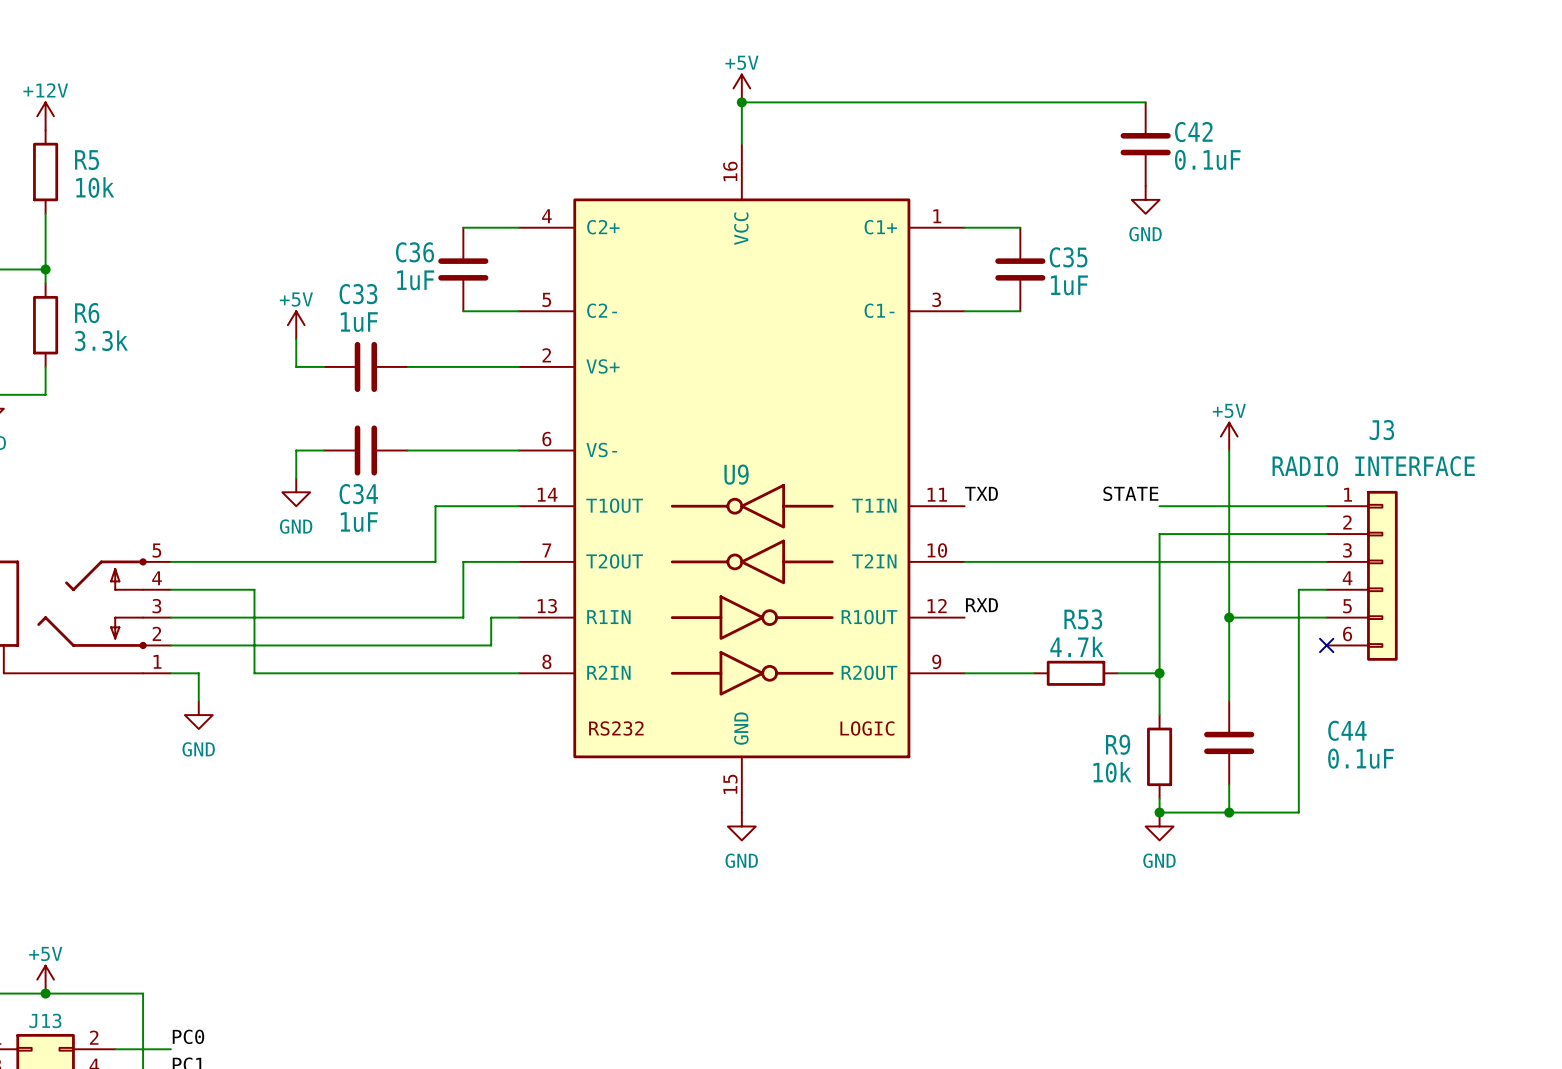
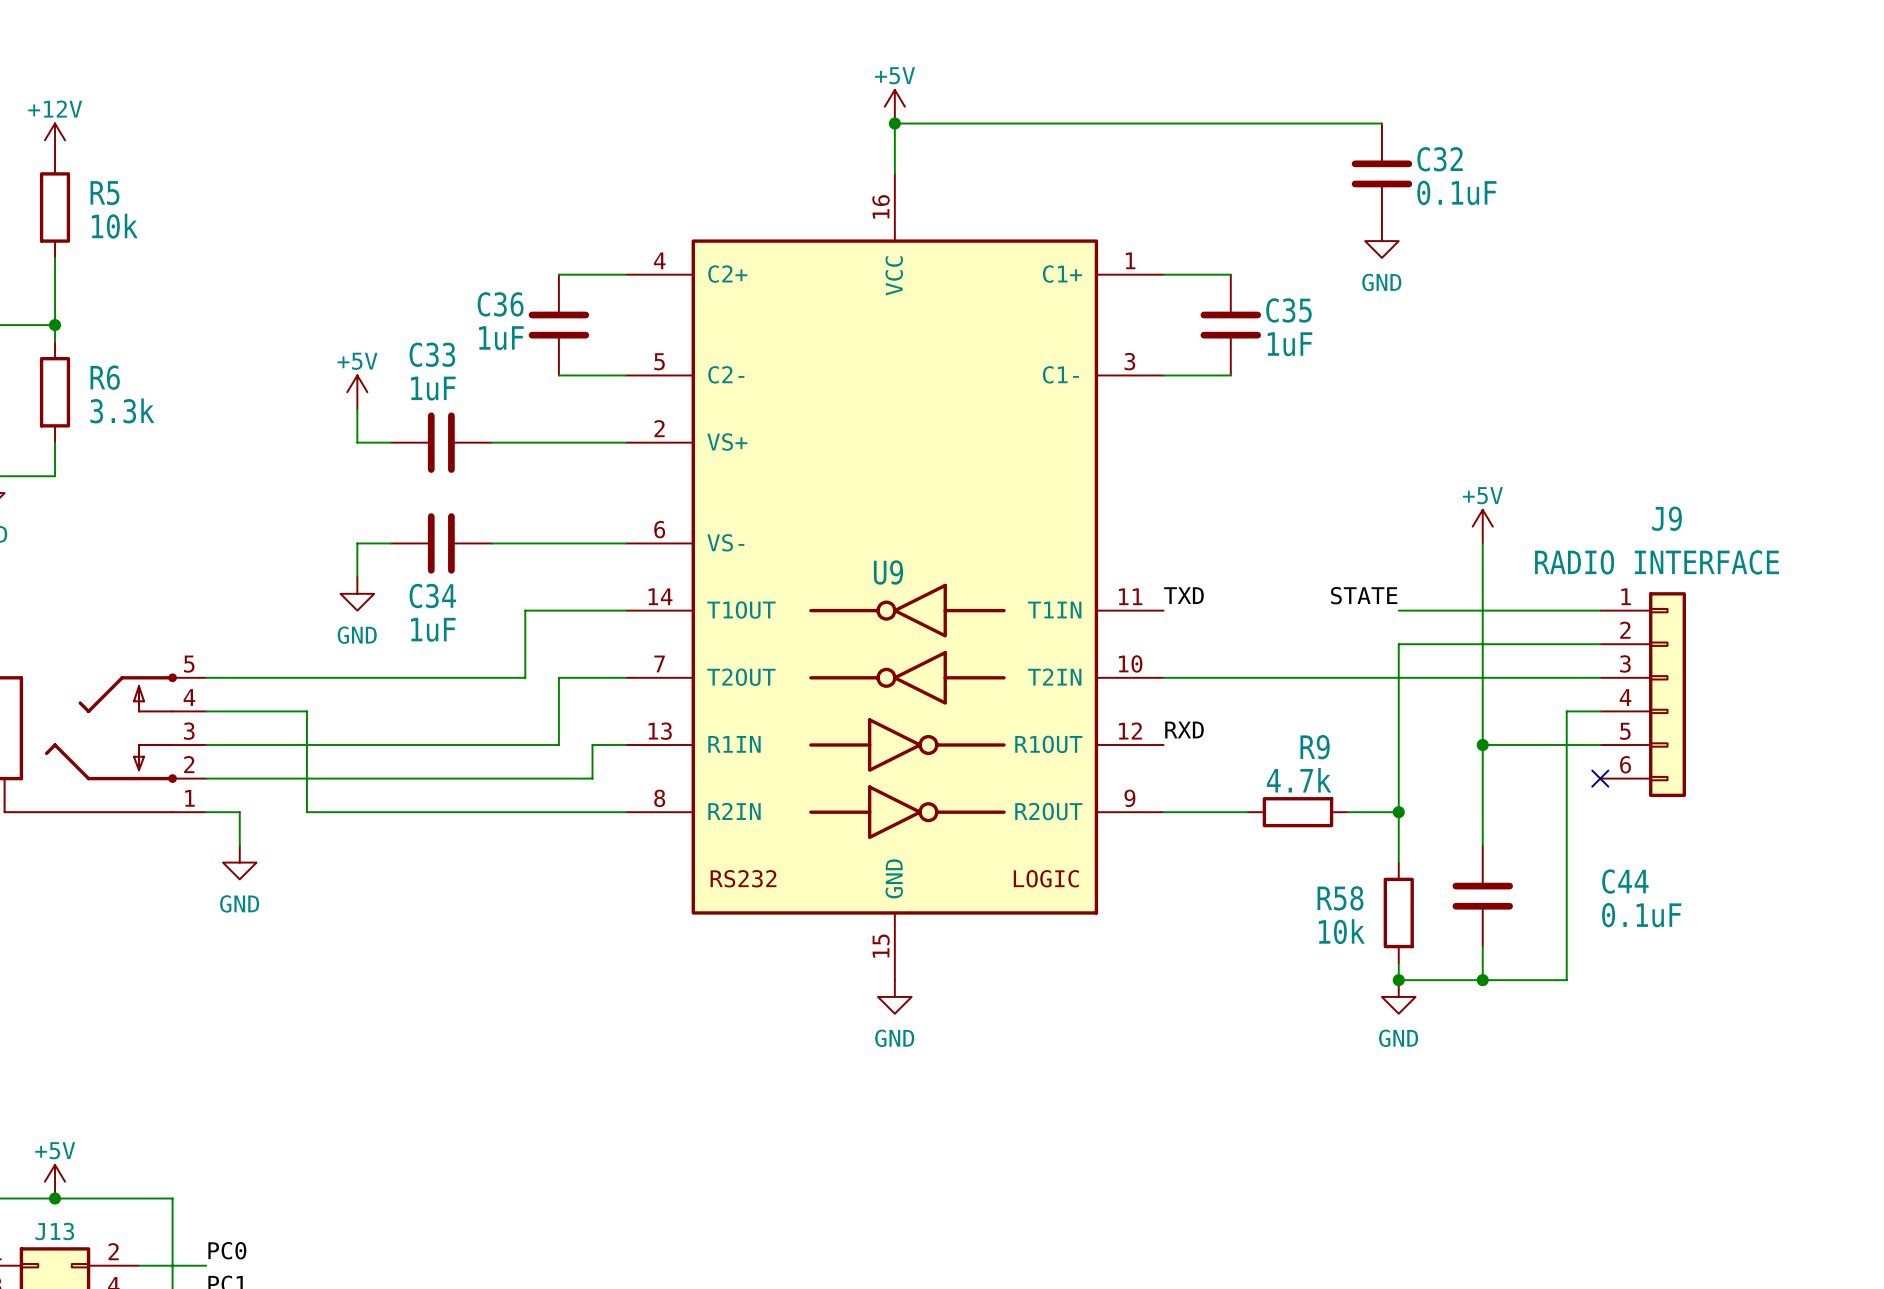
C42 name: C42 (1193, 132) -> C32 (1440, 159)
J3 name: J3 (1381, 430) -> J9 (1667, 518)
R53 name: R53 (1083, 619) -> R9 (1315, 747)
R9 name: R9 (1118, 744) -> R58 (1340, 898)

